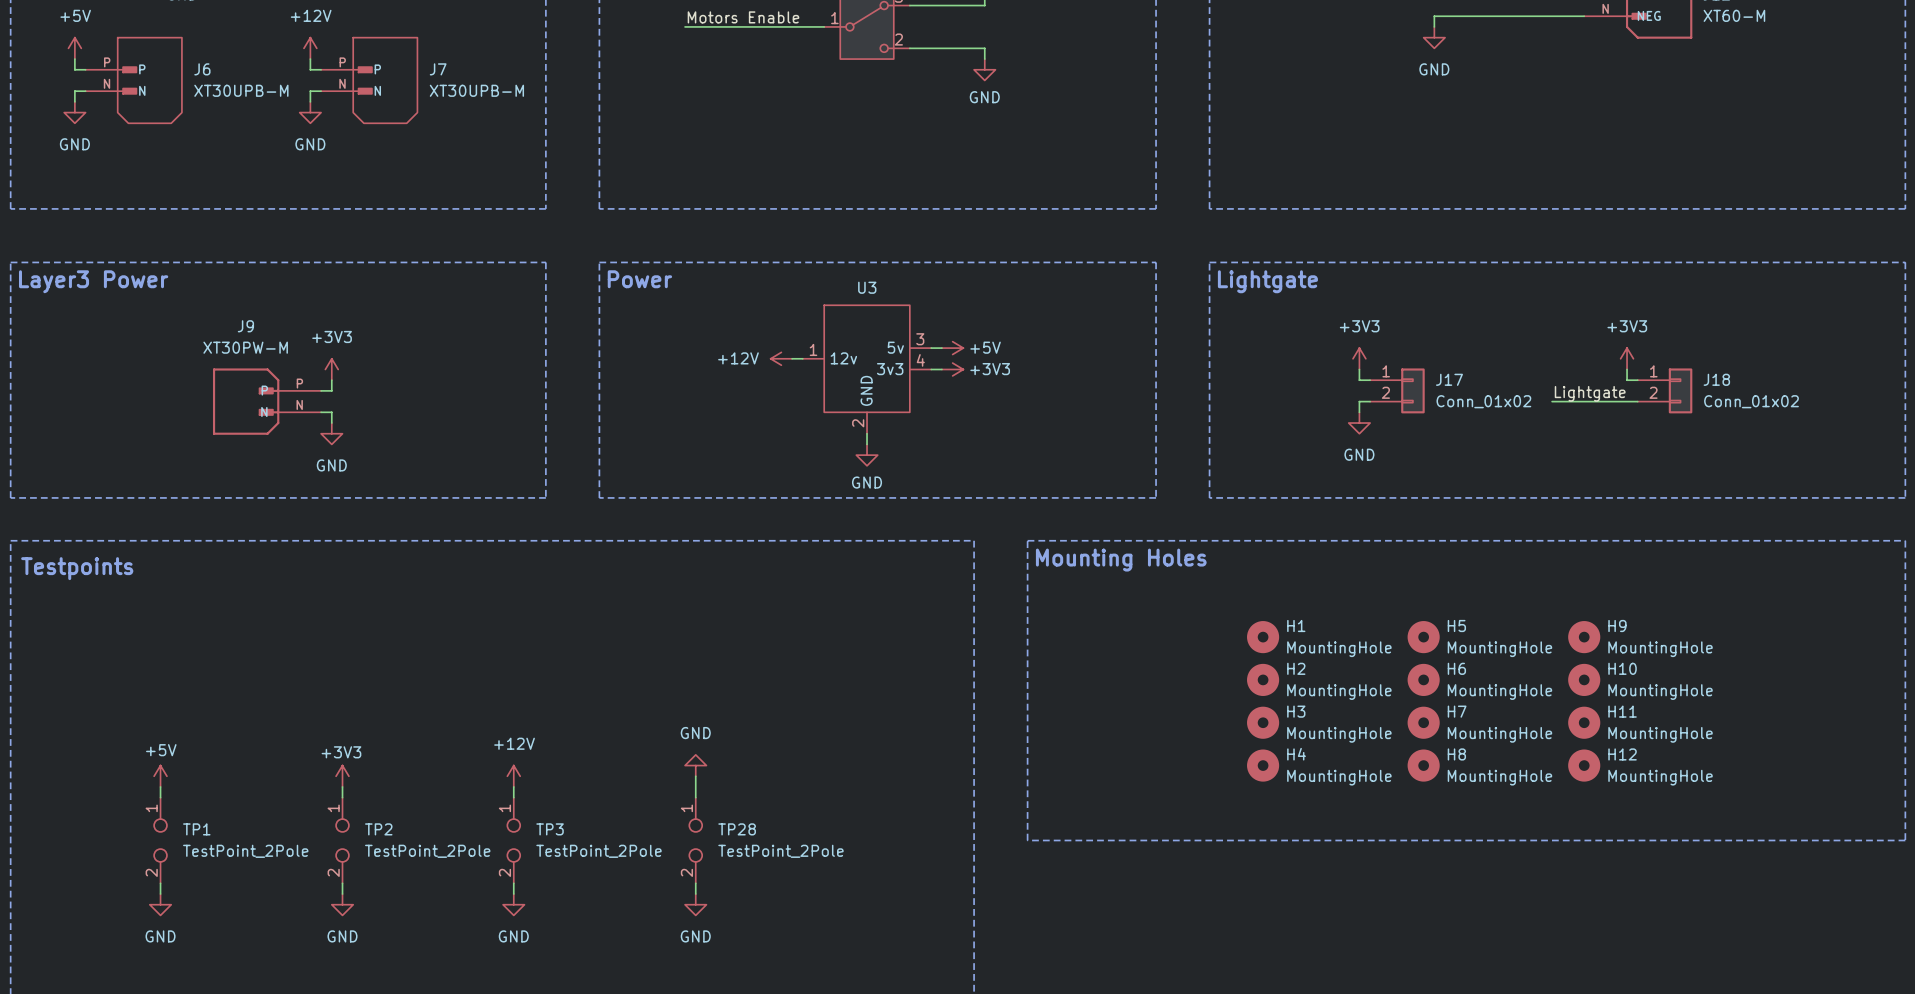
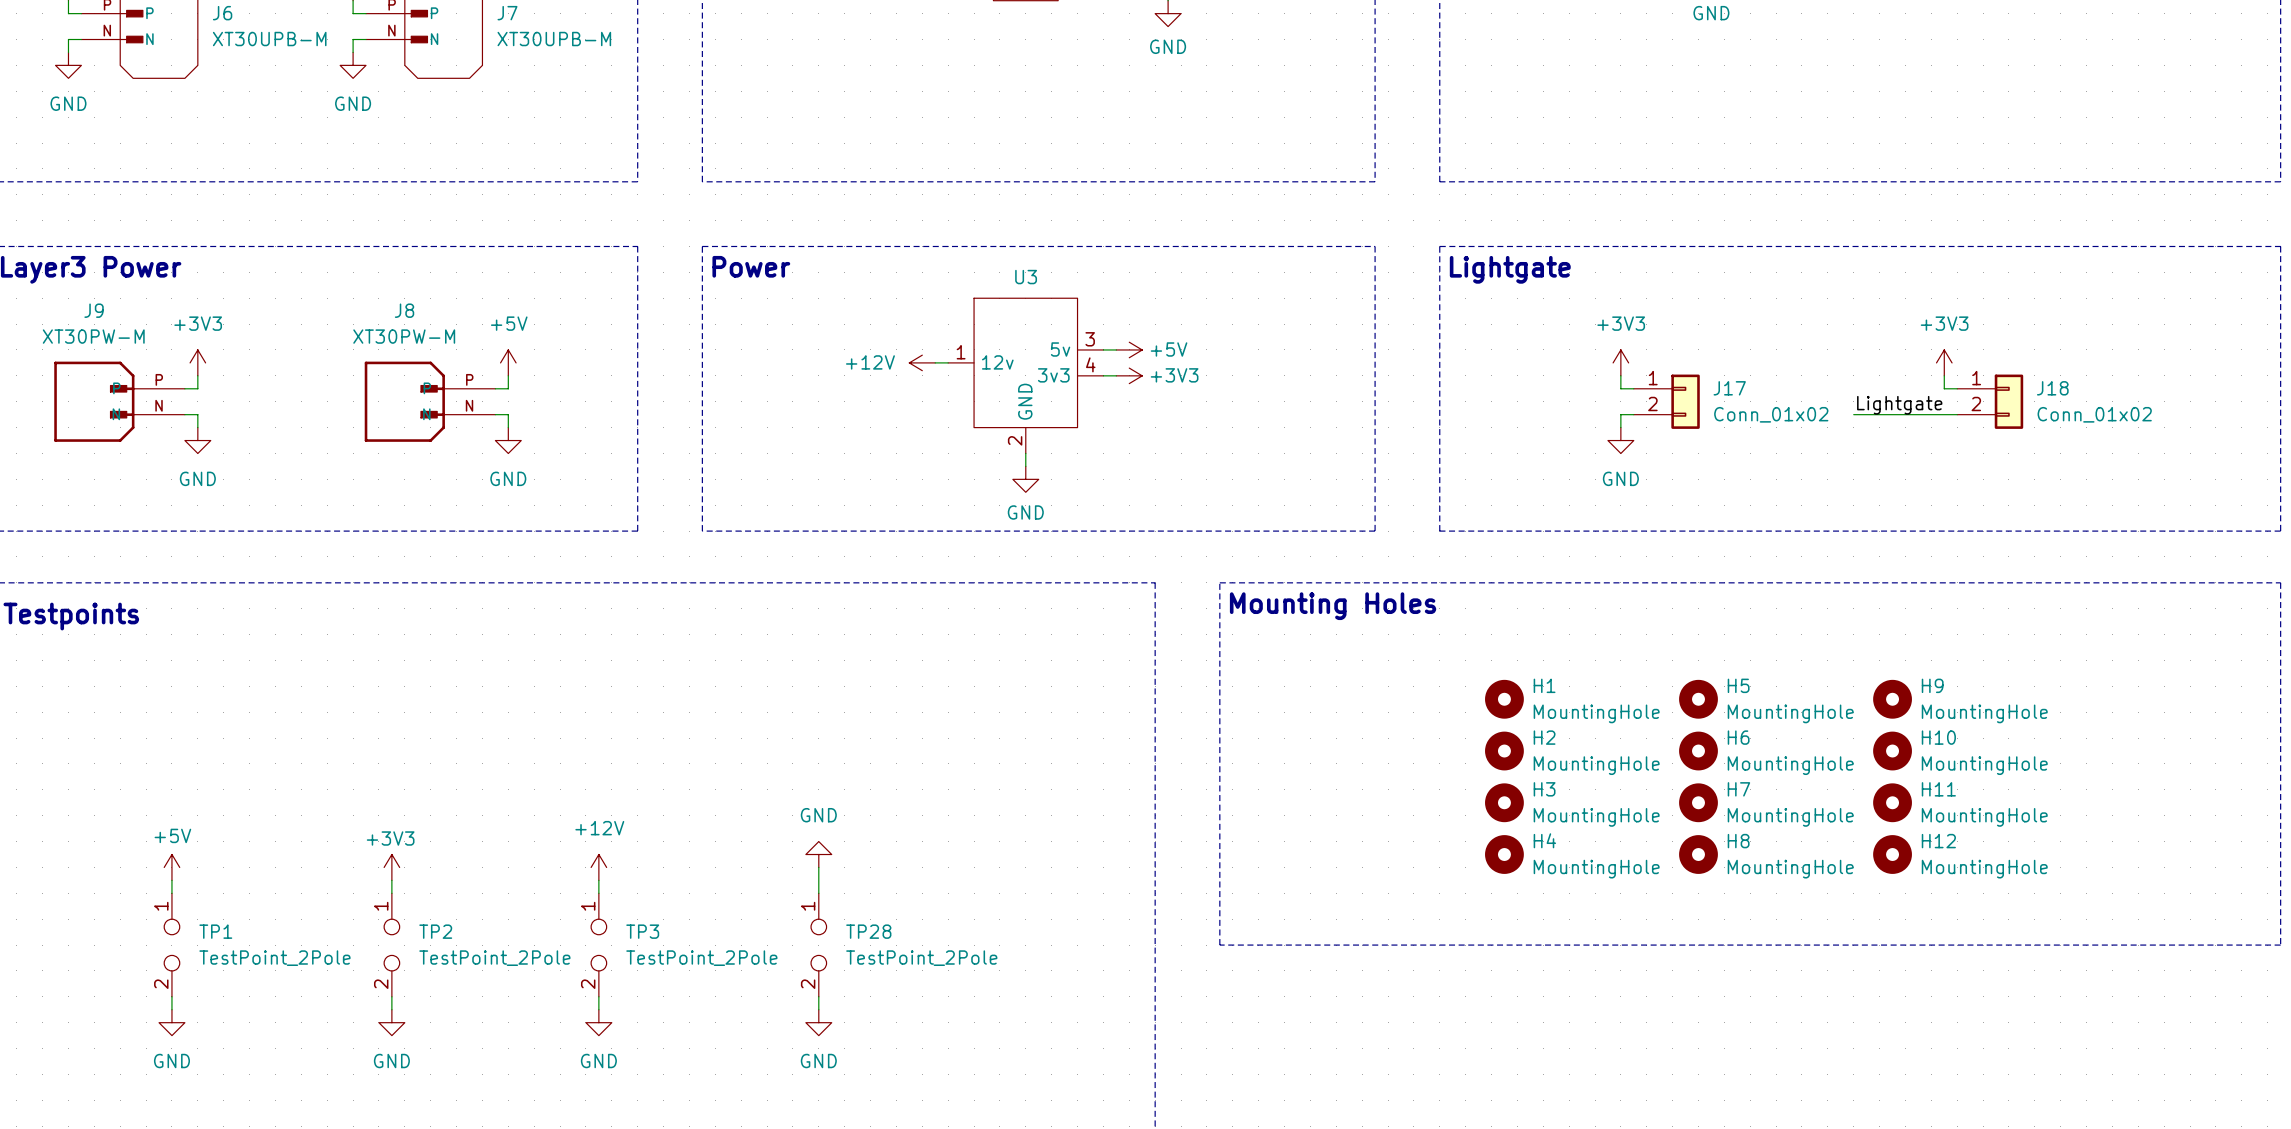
power symbol: none -> +5V (508, 362)
wire: none -> (197, 375) (197, 388) (184, 388)
power symbol position: +3V3 (331, 369) -> +3V3 (197, 362)
wire: (331, 380) (331, 390) (321, 390) -> (508, 375) (508, 388) (495, 388)
J8: none -> XT30PW-M (430, 401)
wire: none -> (184, 414) (197, 414) (197, 427)
J9 position: (267, 401) -> (119, 401)
wire: (321, 412) (331, 412) (331, 423) -> (495, 414) (508, 414) (508, 427)
power symbol: none -> GND (197, 440)
power symbol: none -> GND (508, 440)
power symbol: GND (331, 433) -> none

